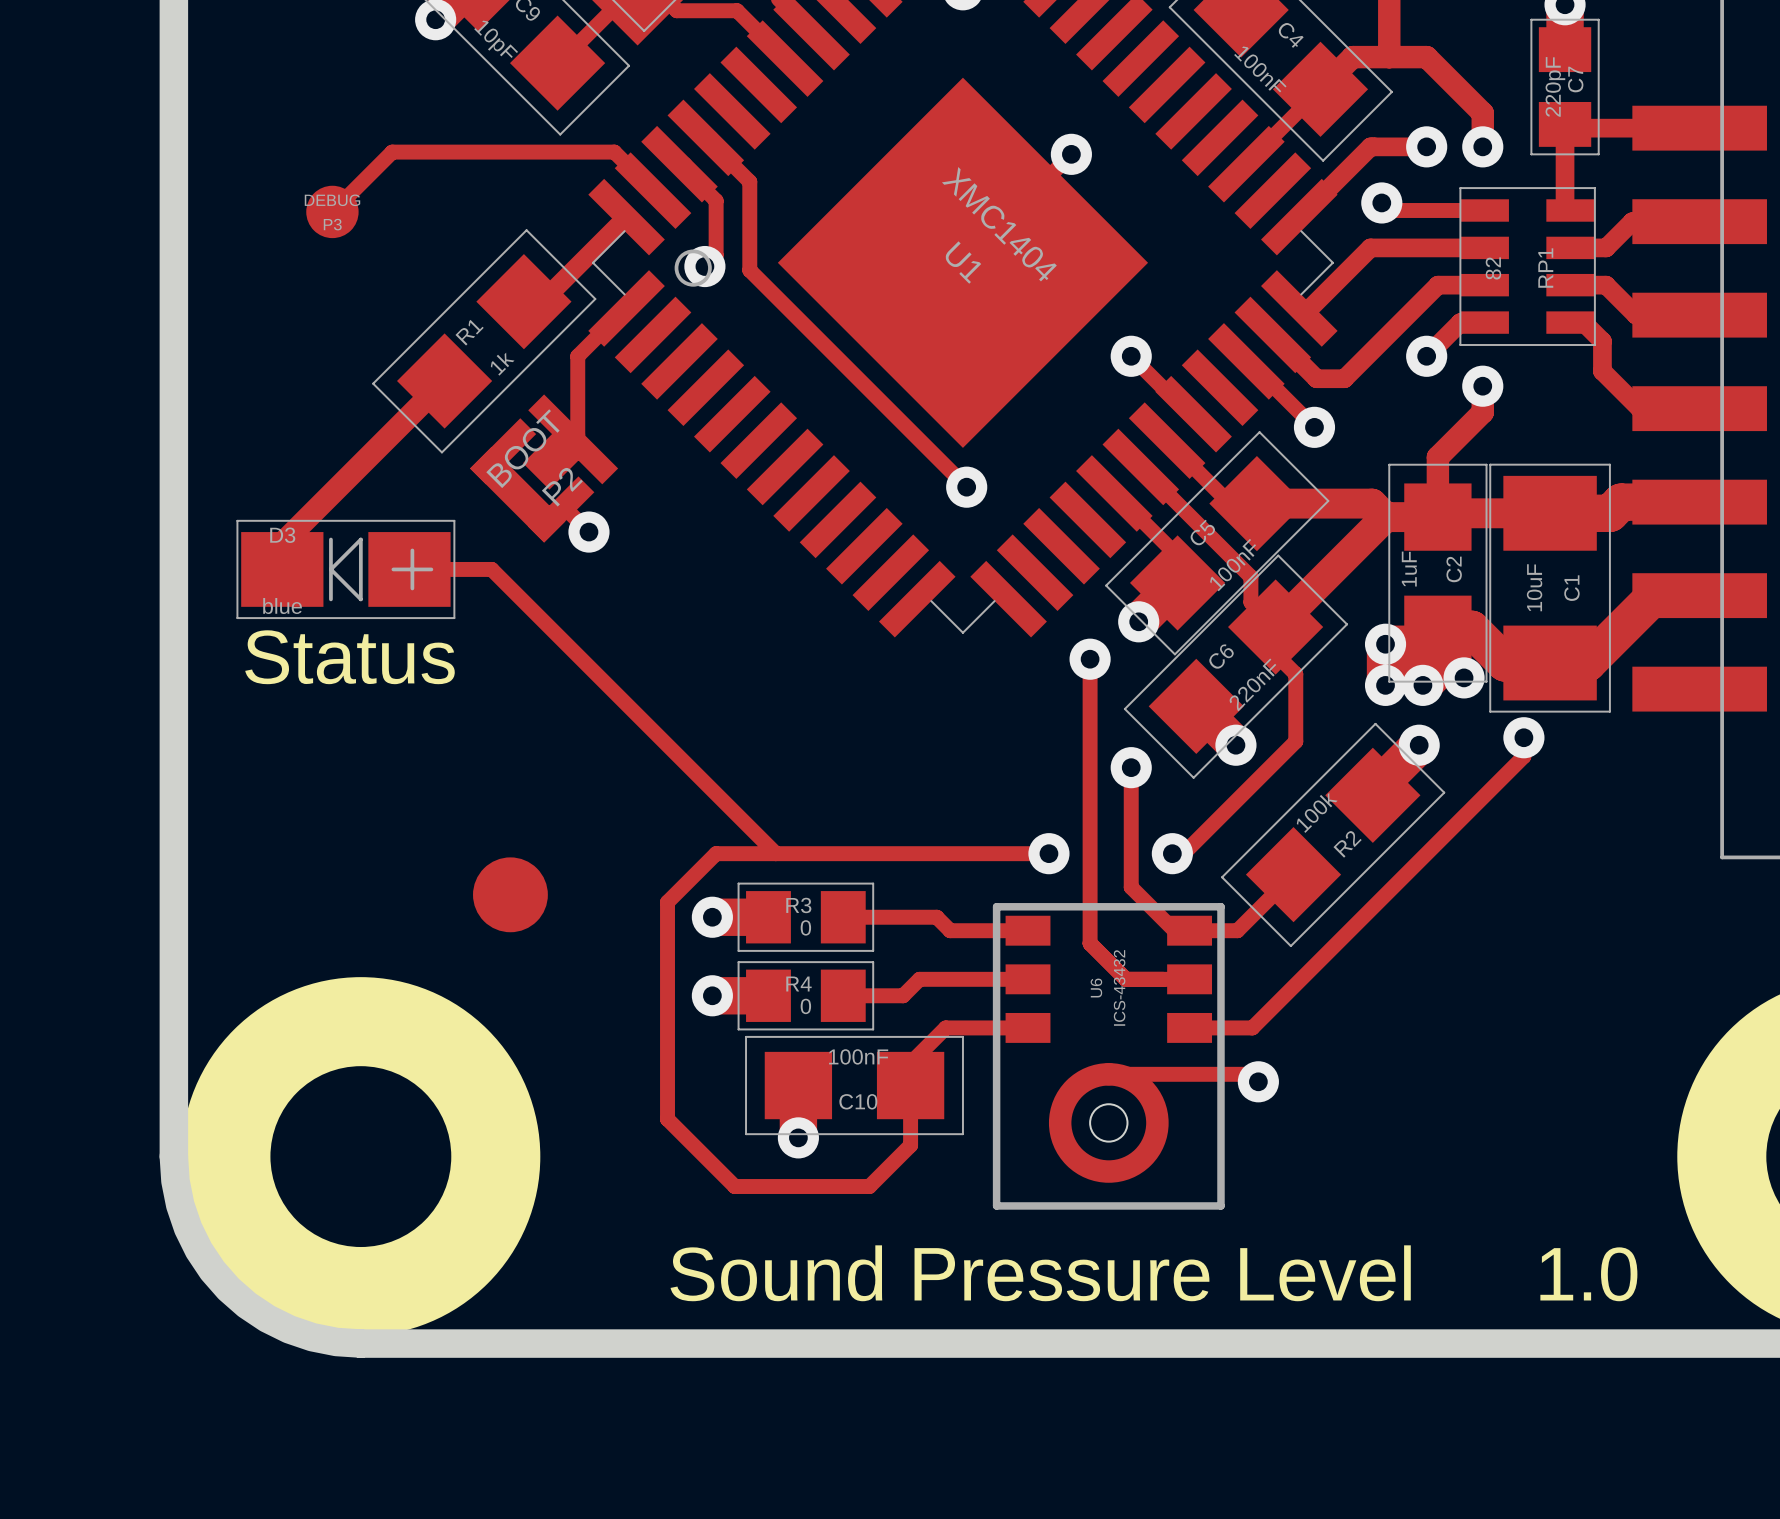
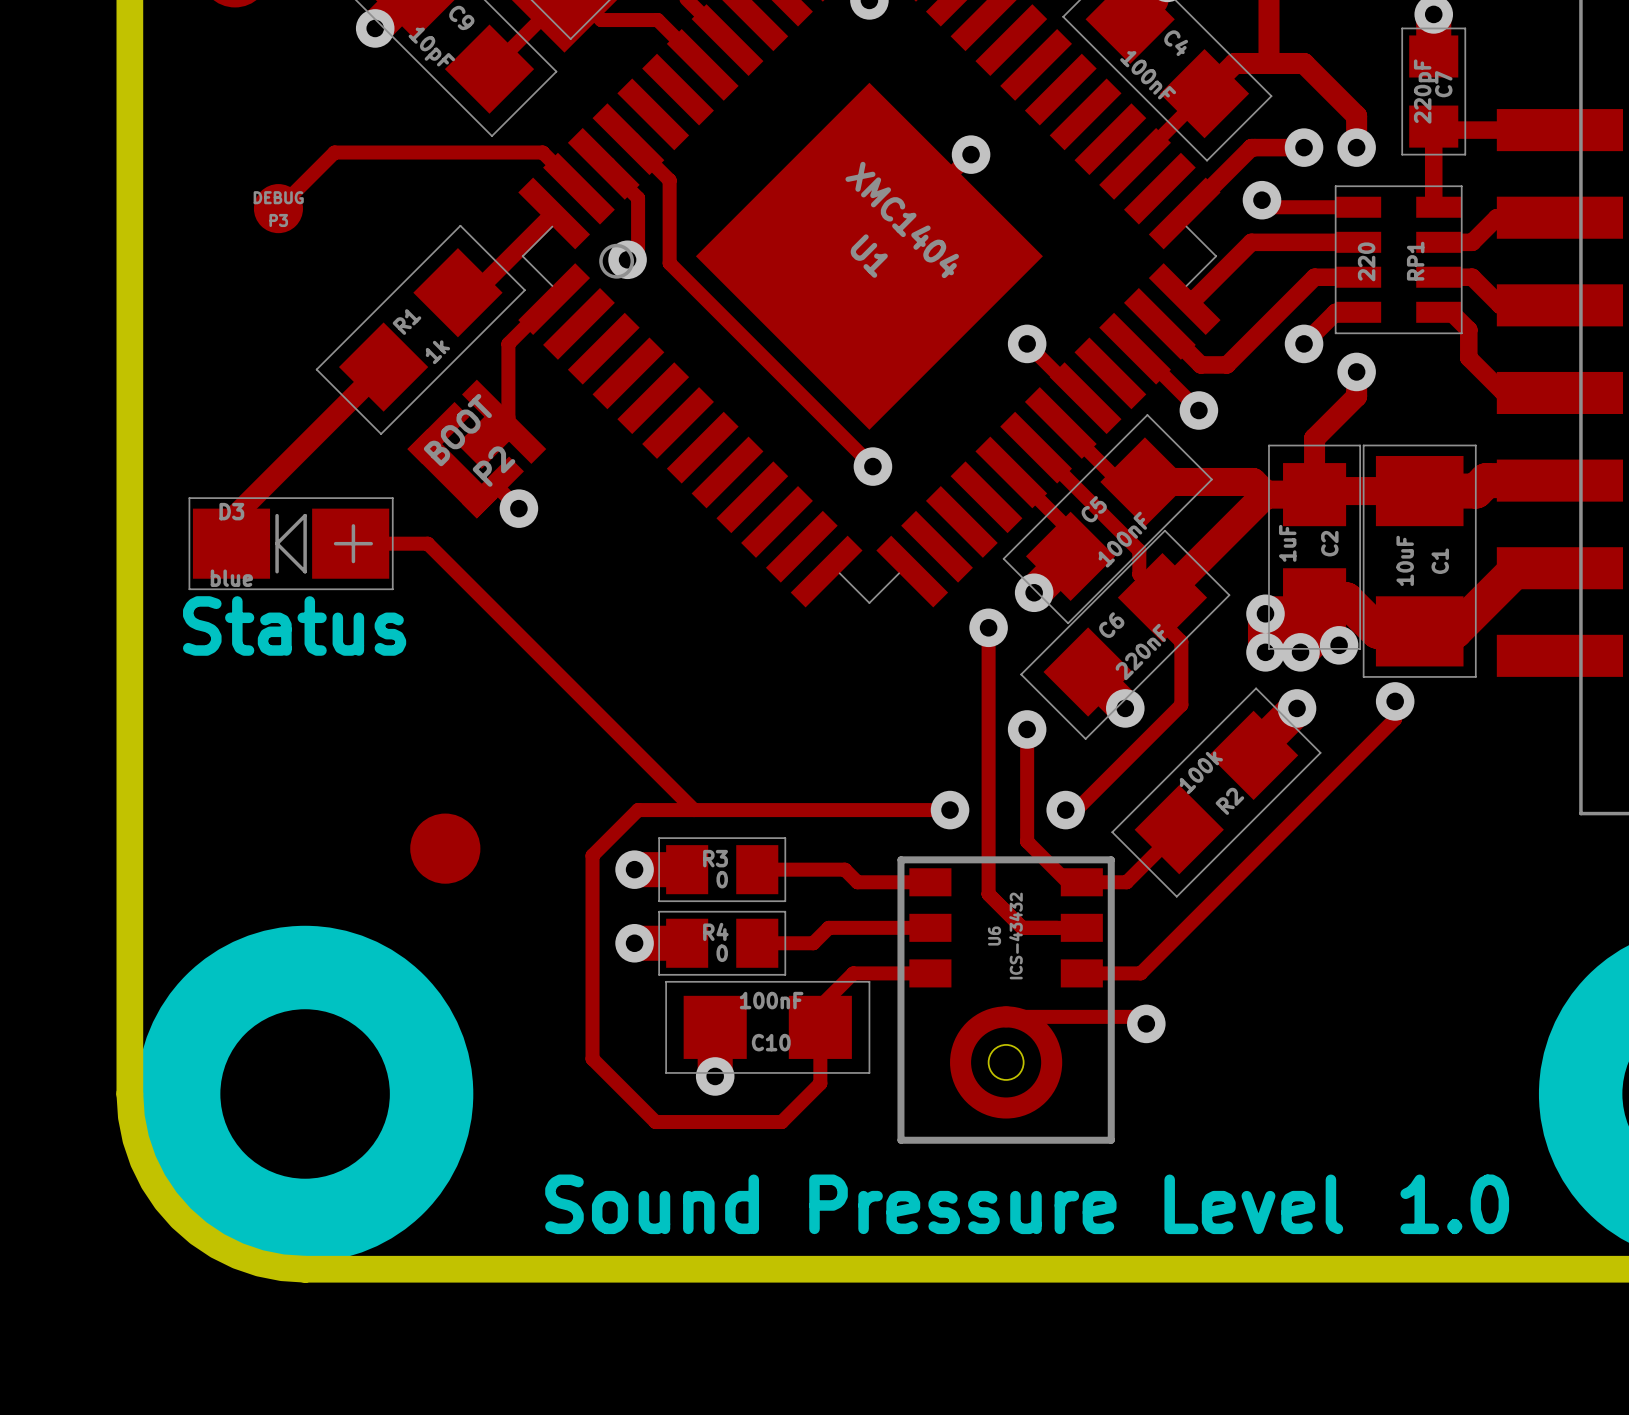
RP1 value: 82 (1493, 268) -> 220 (1366, 261)

